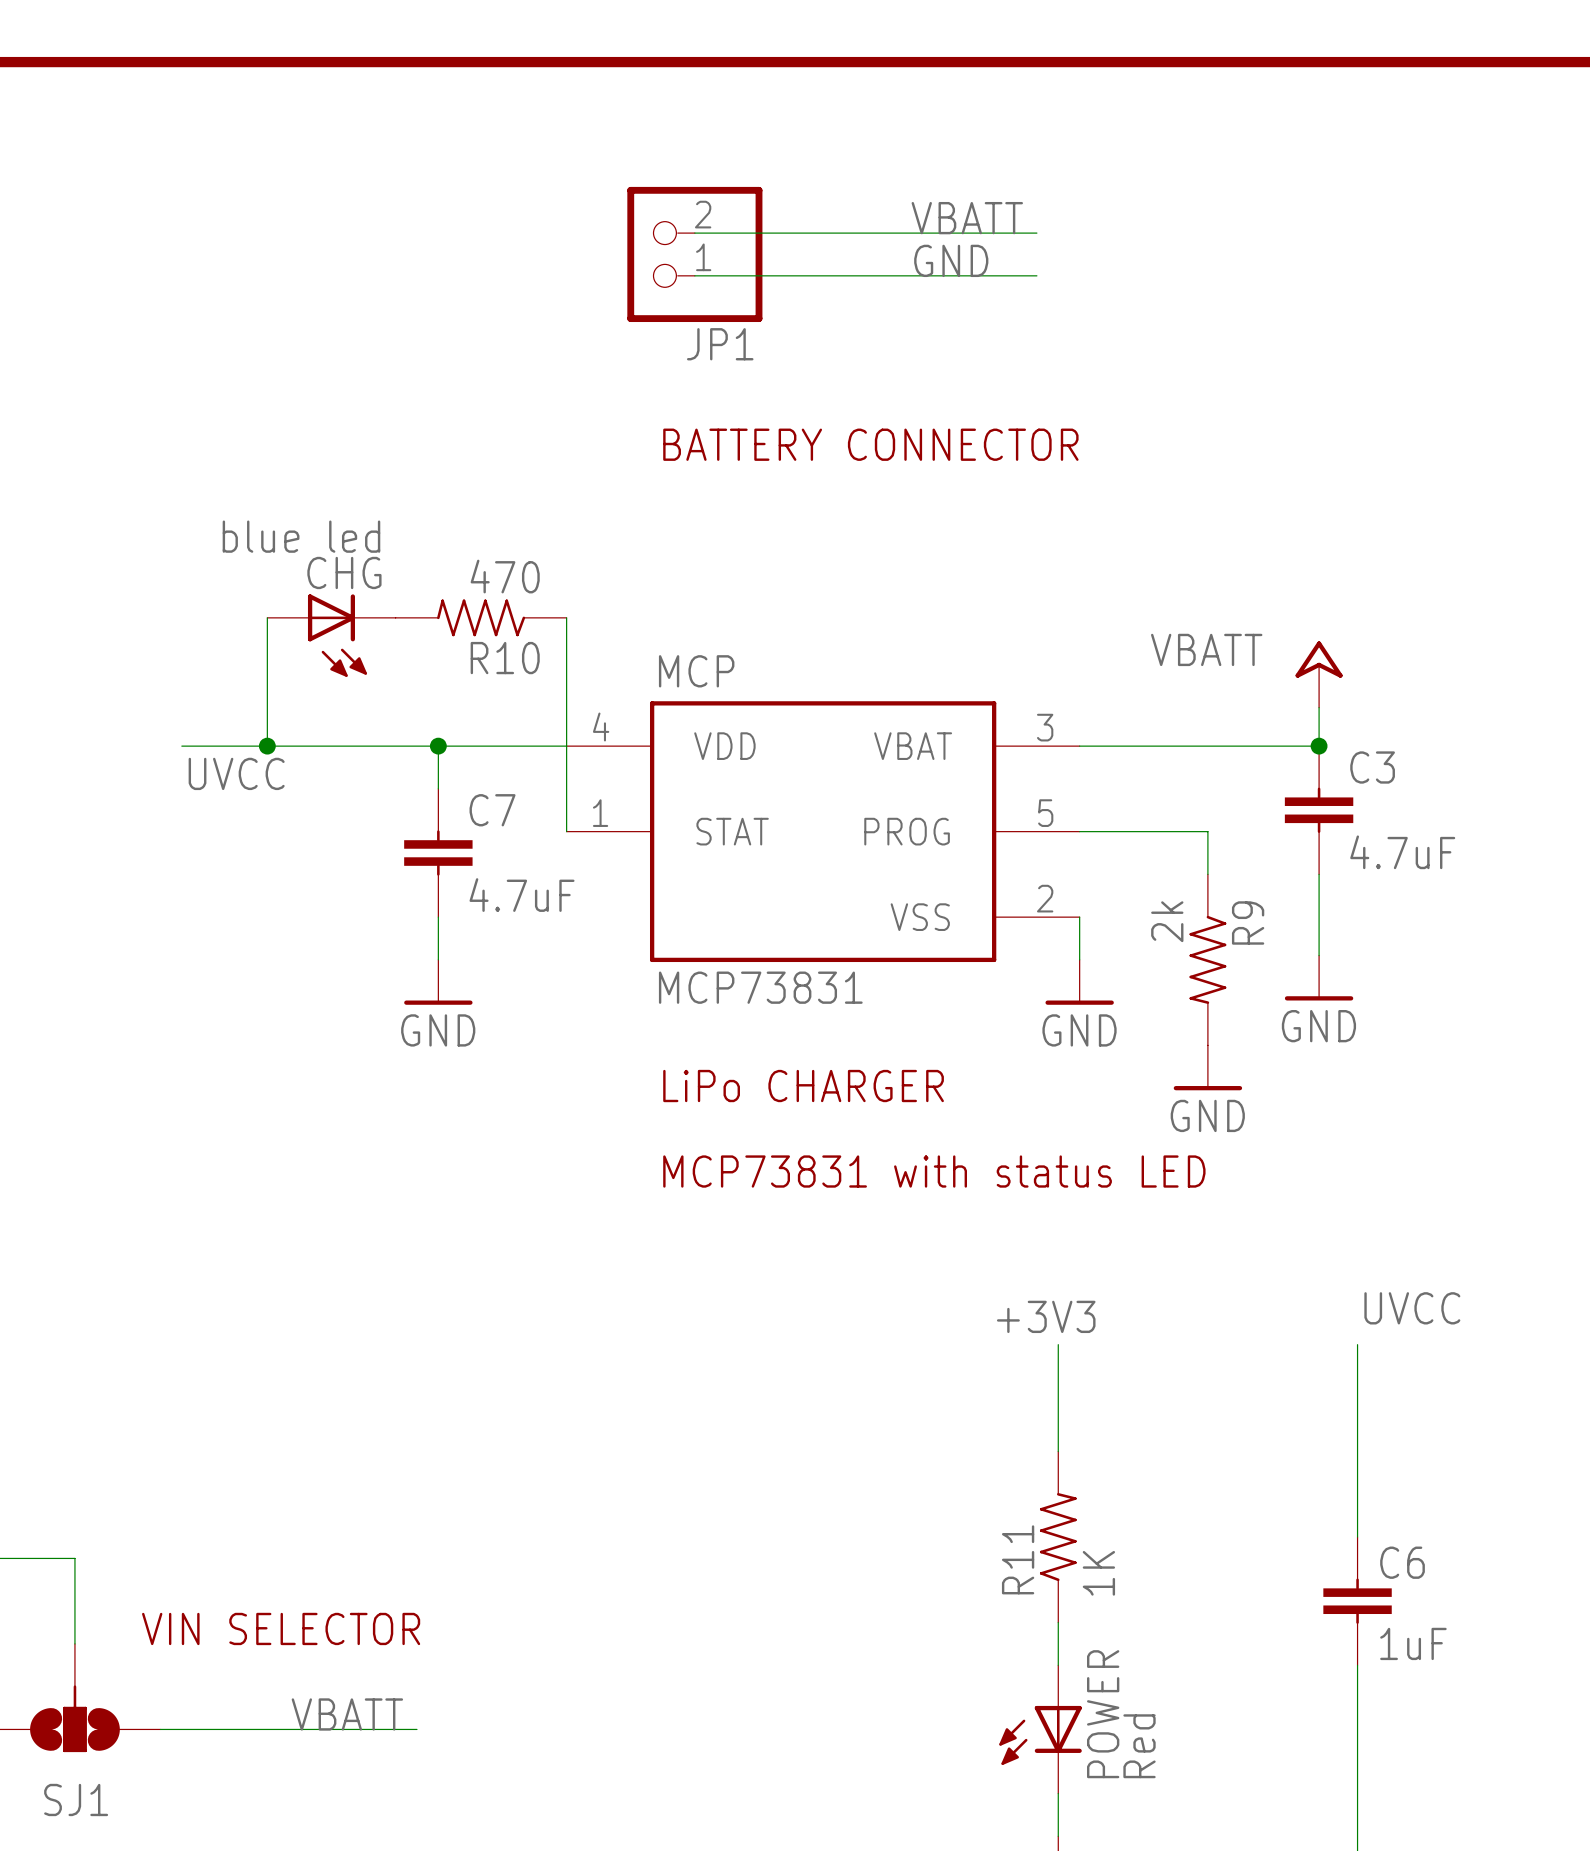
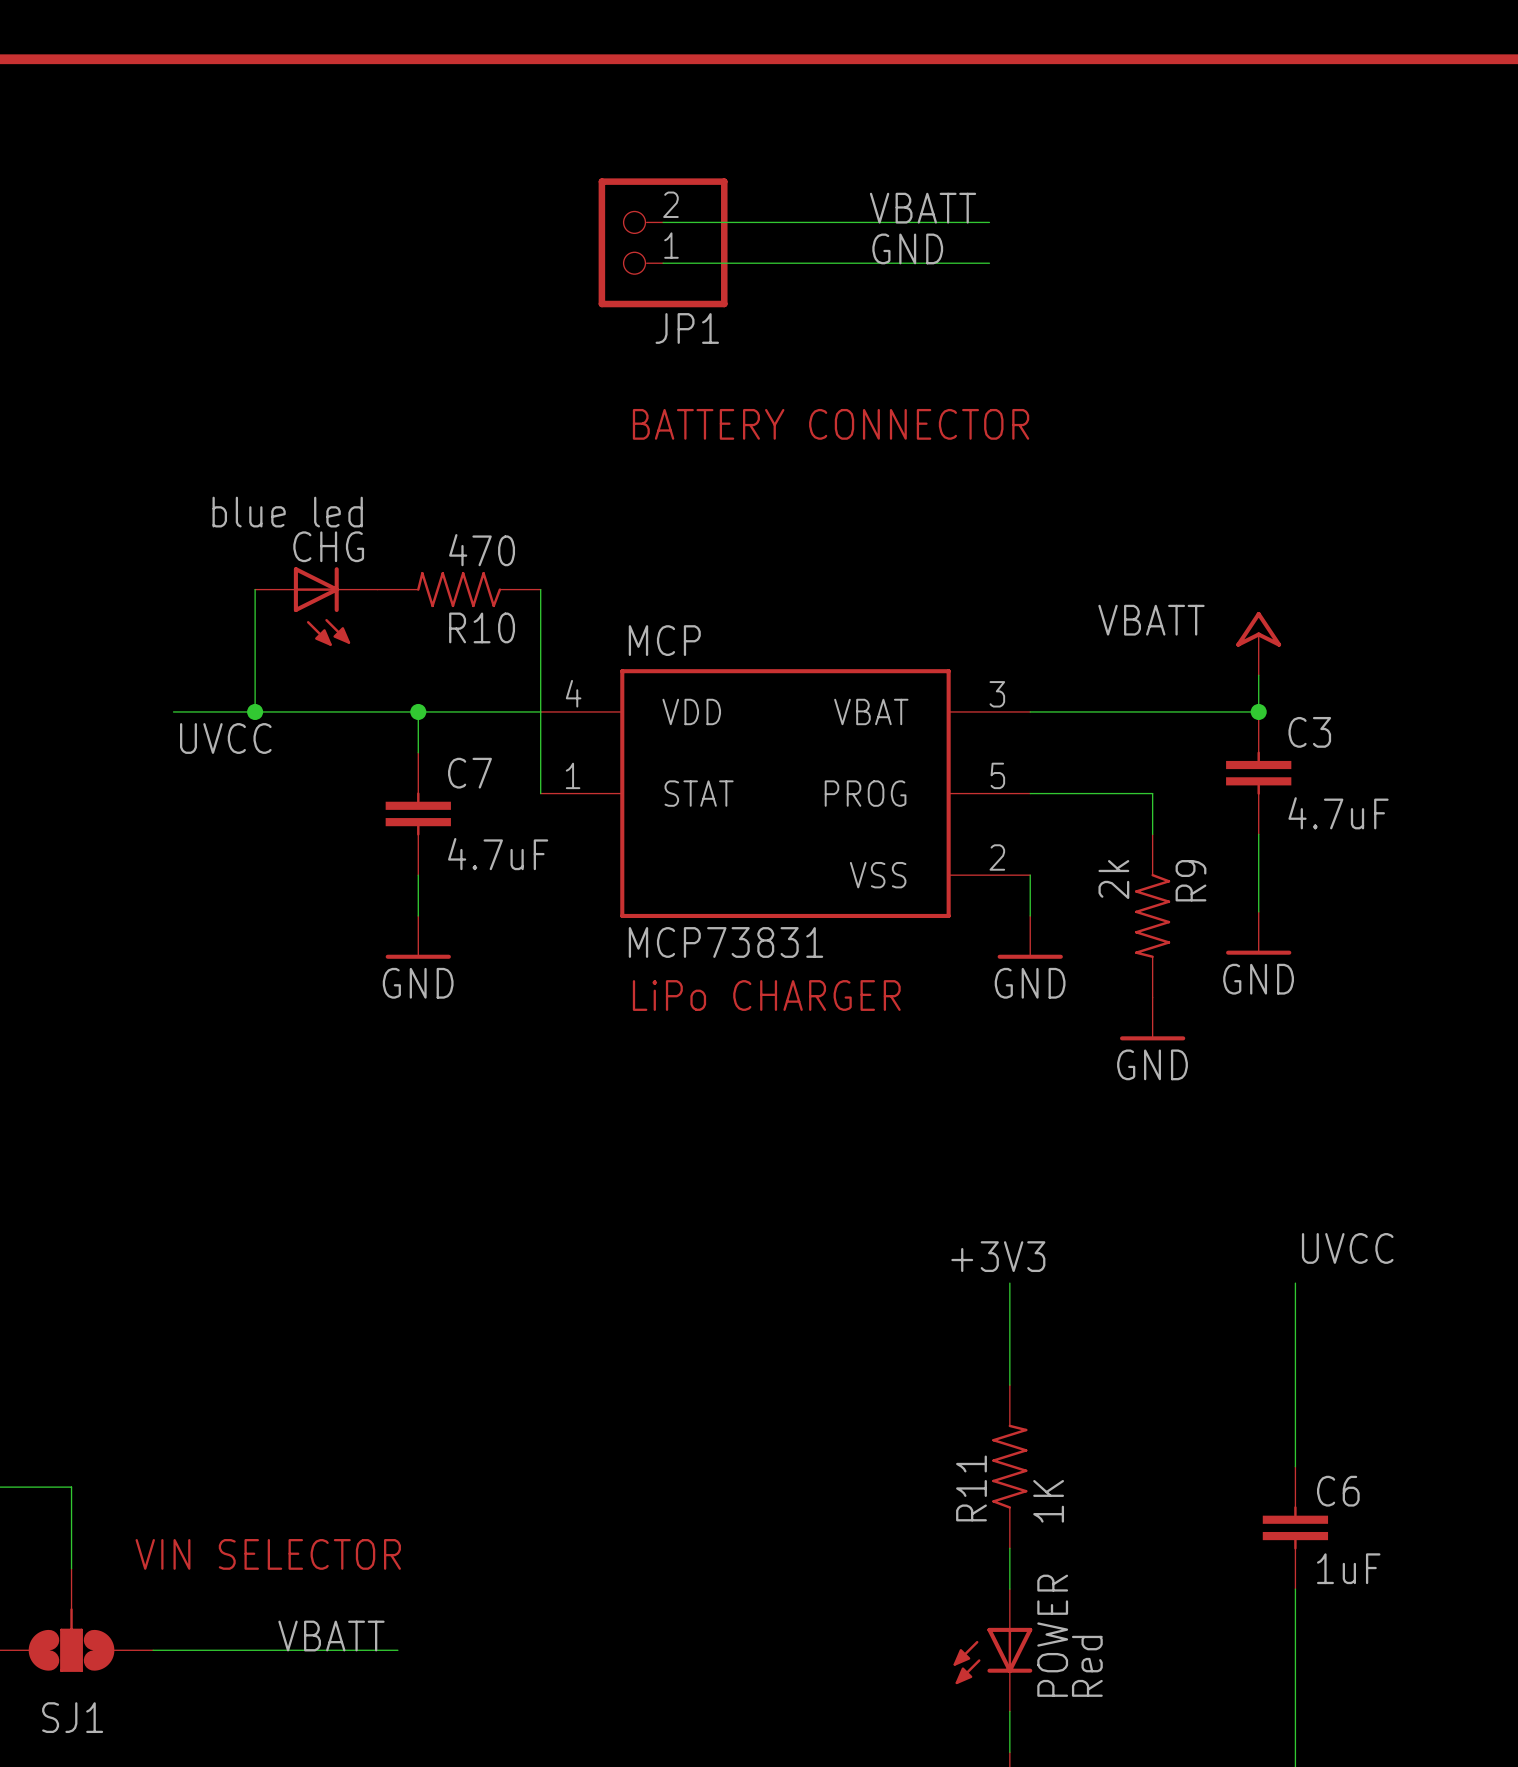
text position: LiPo CHARGER (803, 1086) -> LiPo CHARGER (766, 995)
text: MCP73831 with status LED (934, 1171) -> none

